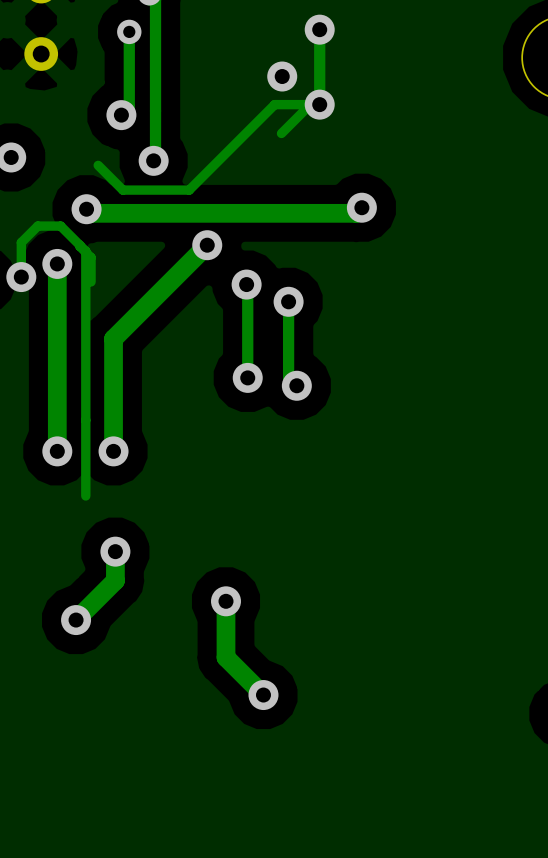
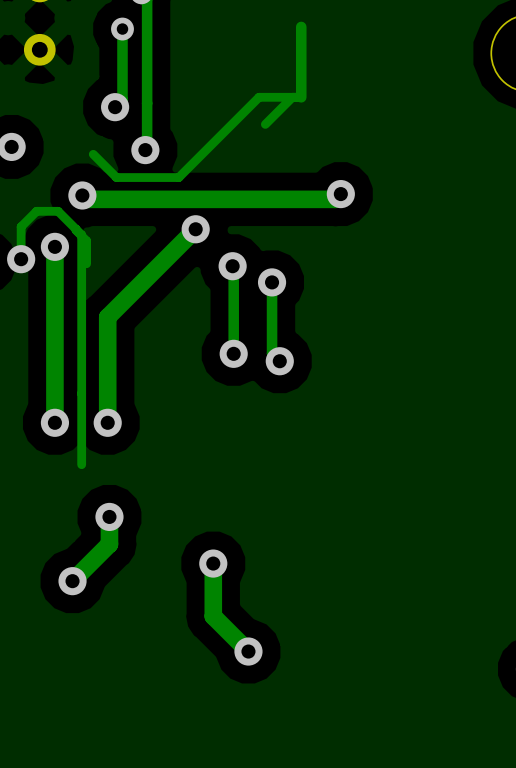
via: (319, 29) -> none
via: (282, 76) -> none
via: (319, 104) -> none

